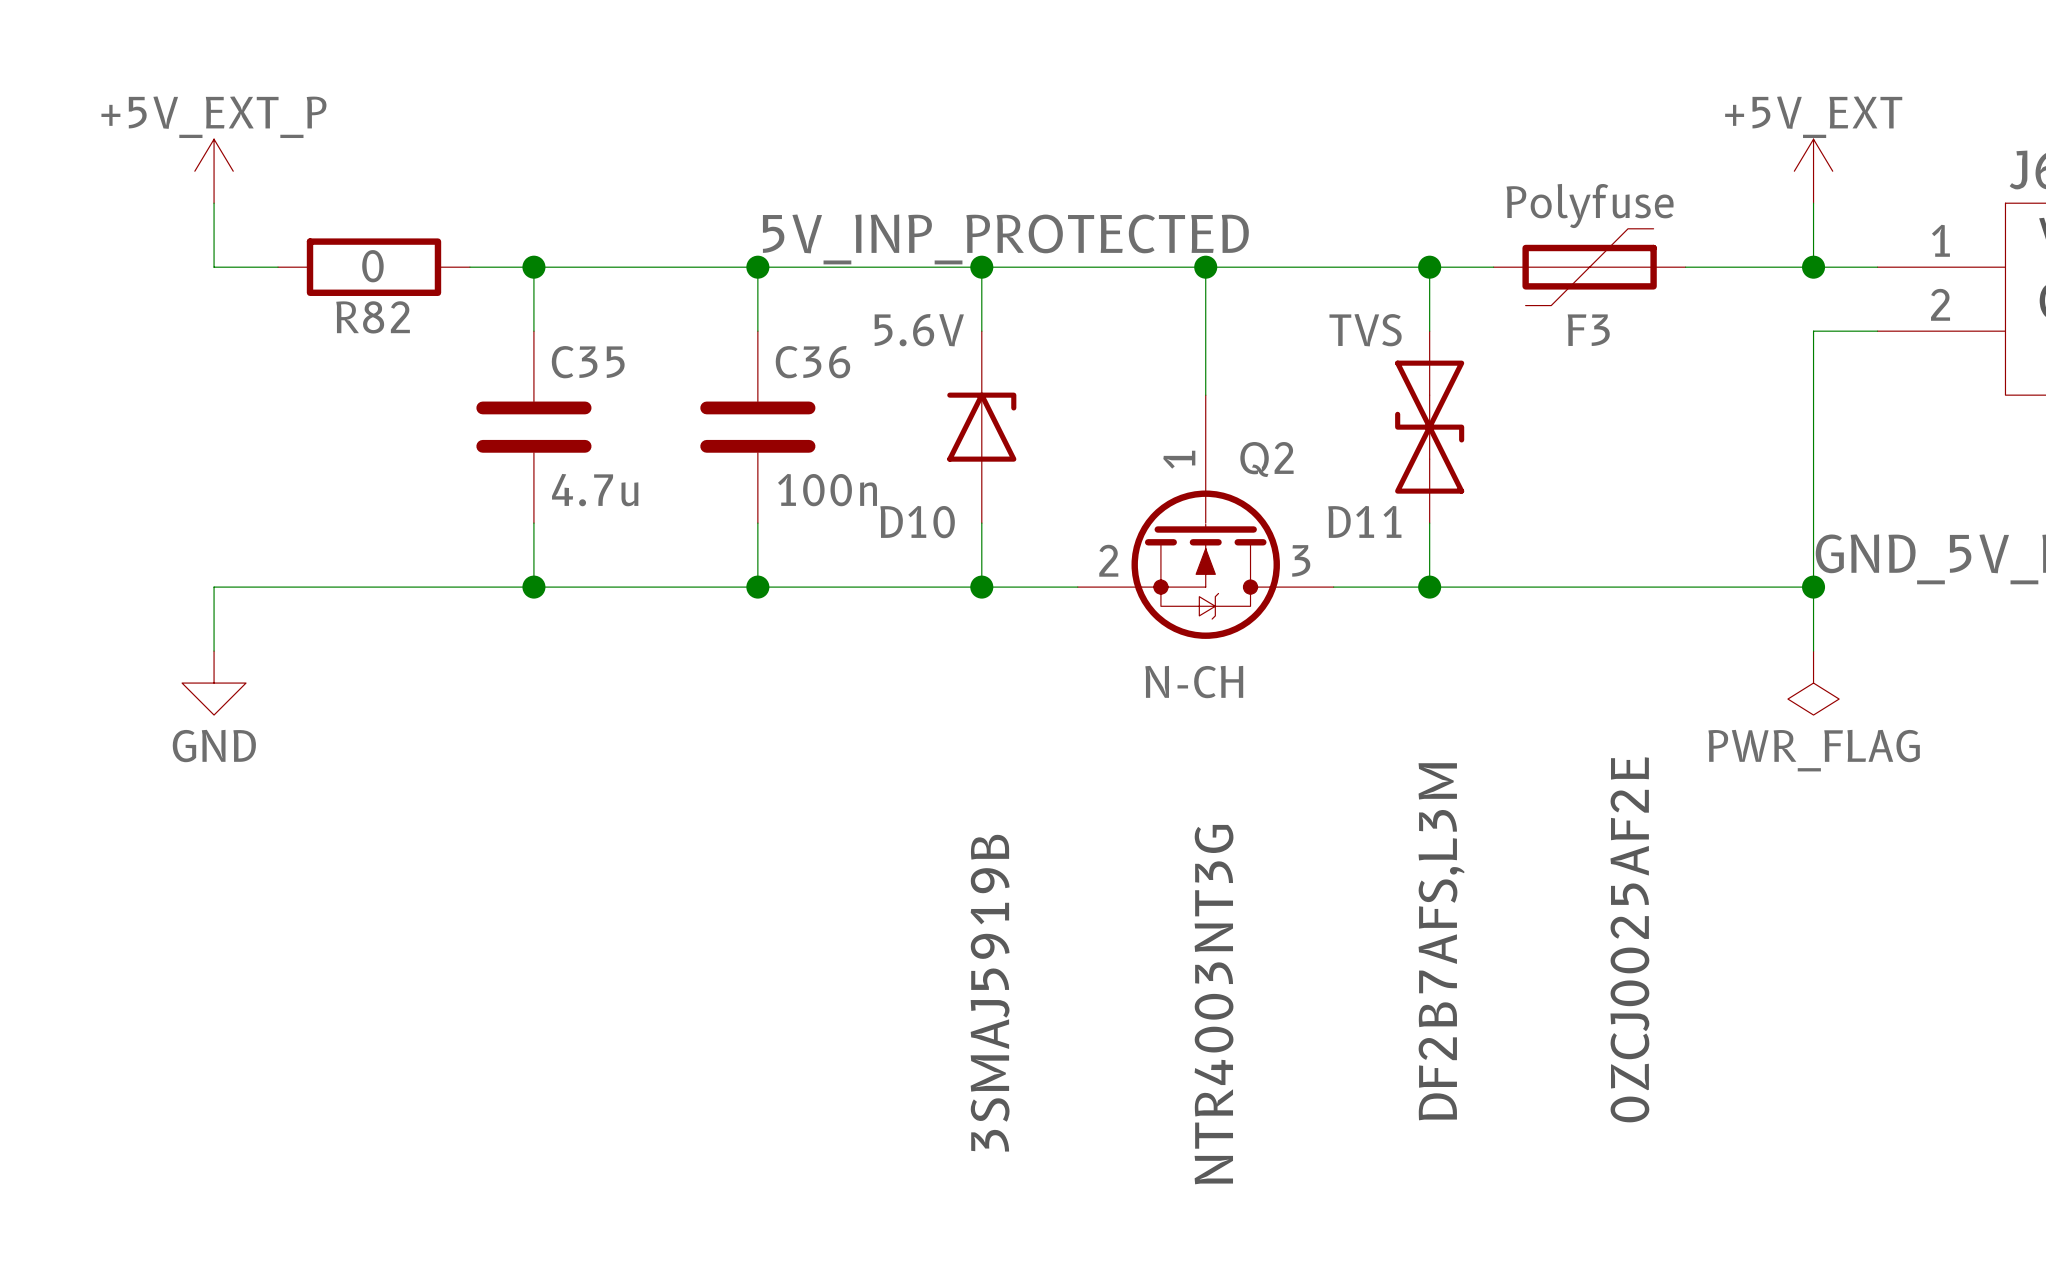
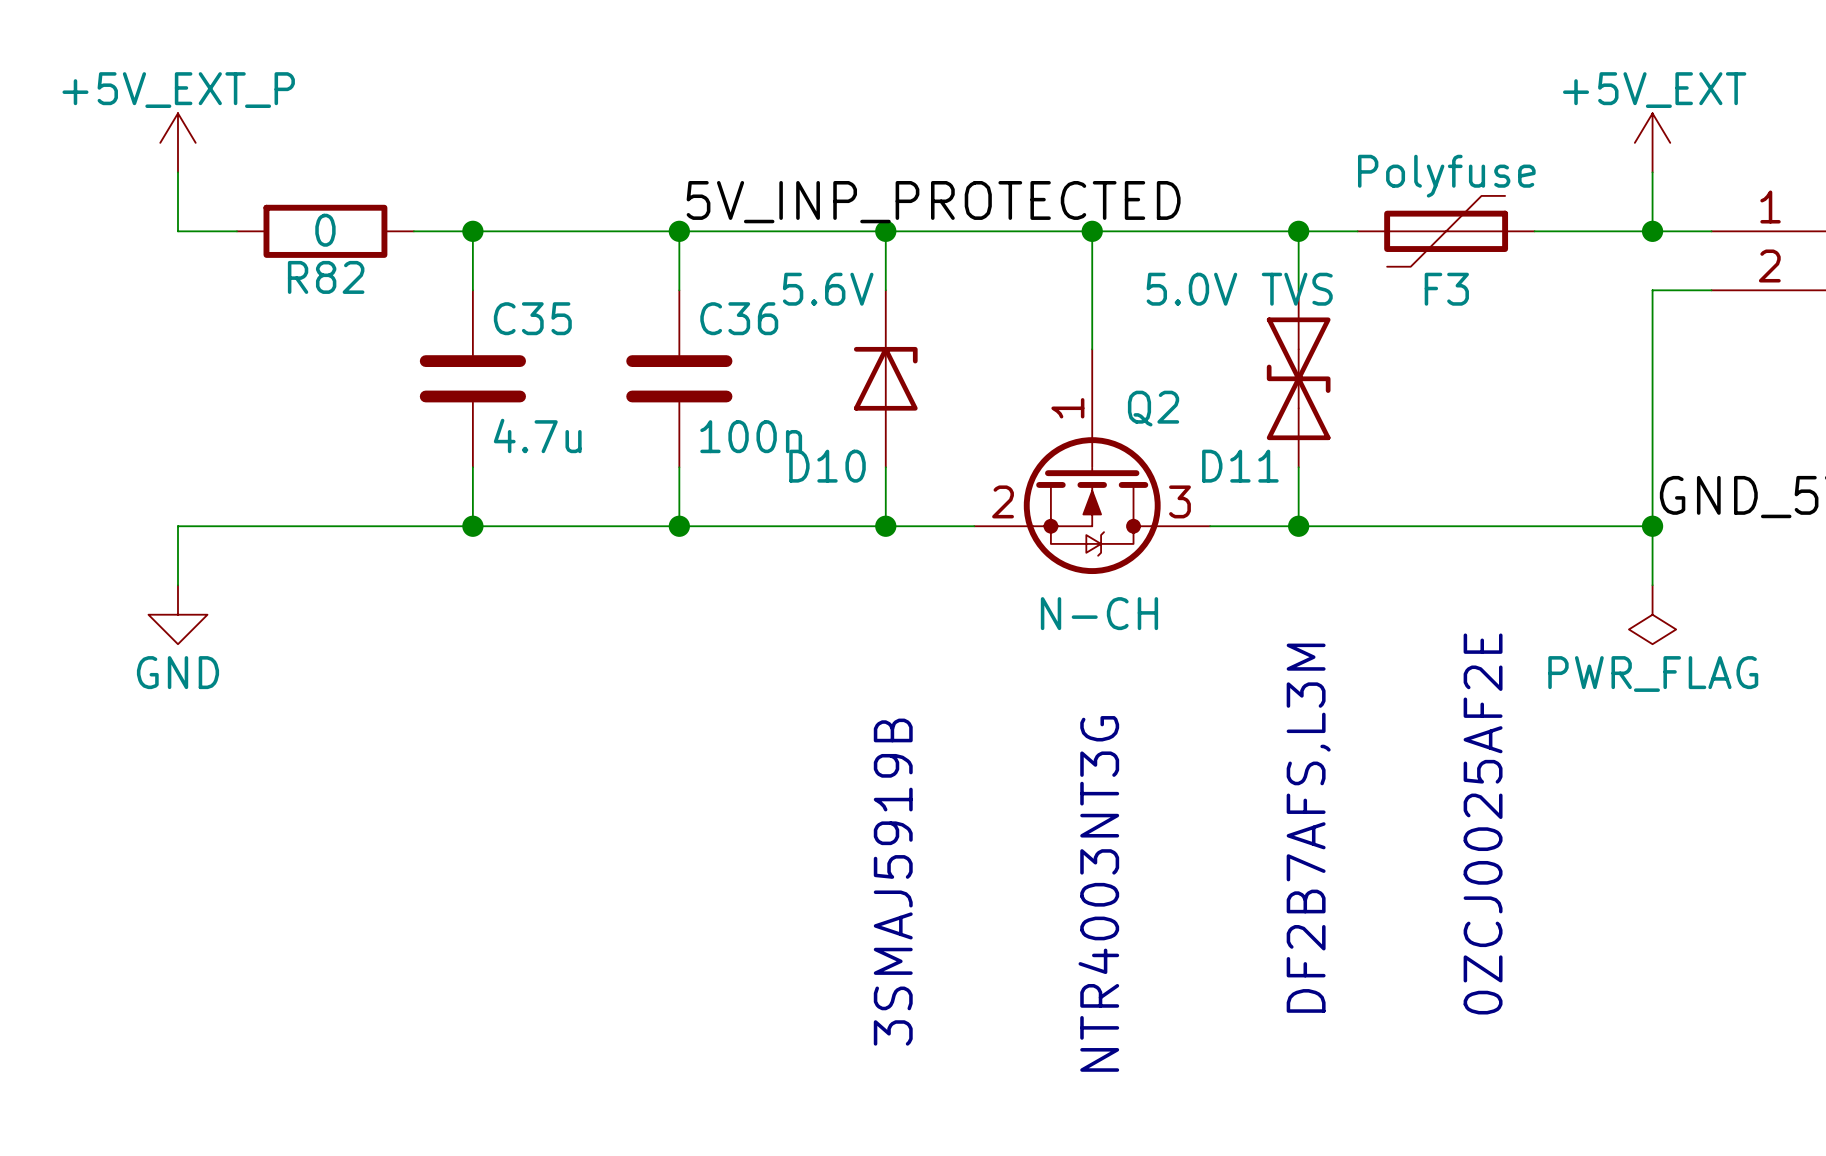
D11 value: TVS (1365, 330) -> 5.0V TVS (1239, 289)

